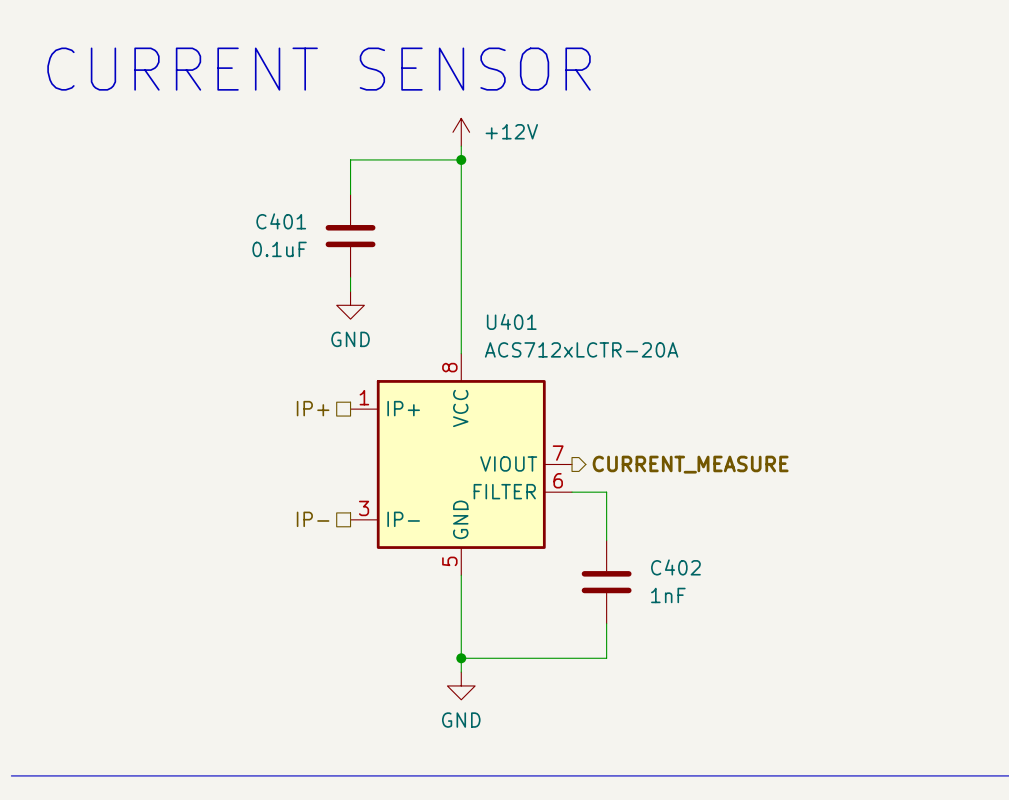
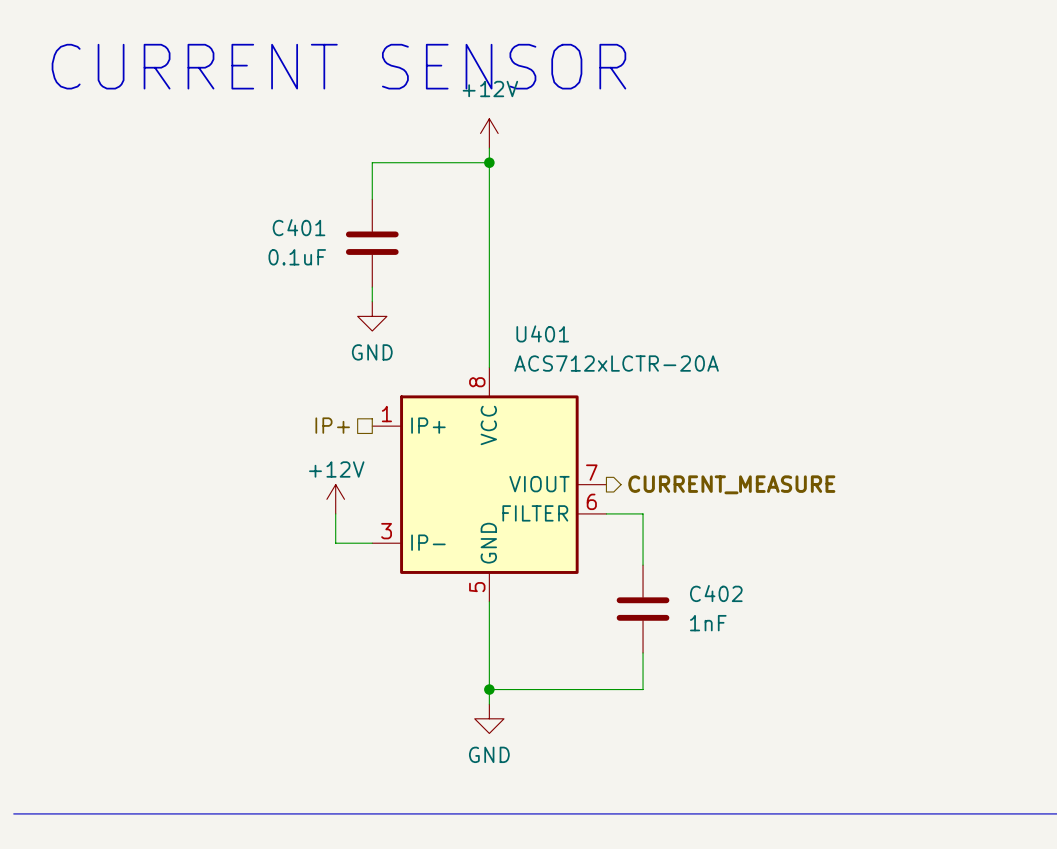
power symbol text position: +12V (511, 131) -> +12V (490, 89)
power symbol: none -> +12V (335, 499)
wire: none -> (335, 513) (335, 543) (372, 543)
hierarchical label: IP- (313, 519) -> none

